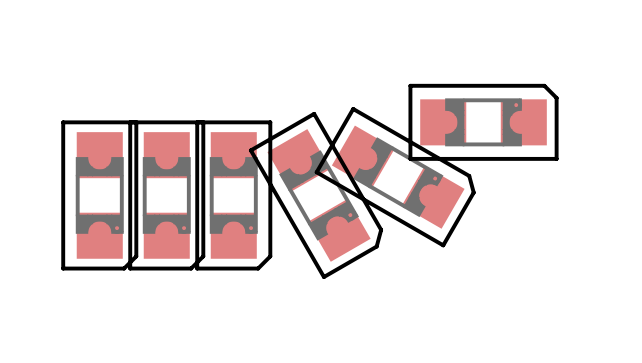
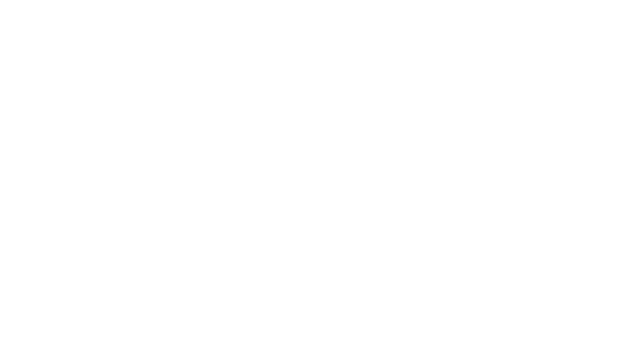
part: (483, 122) -> none
part: (395, 177) -> none
part: (99, 195) -> none
part: (166, 195) -> none
part: (233, 195) -> none
part: (316, 195) -> none

